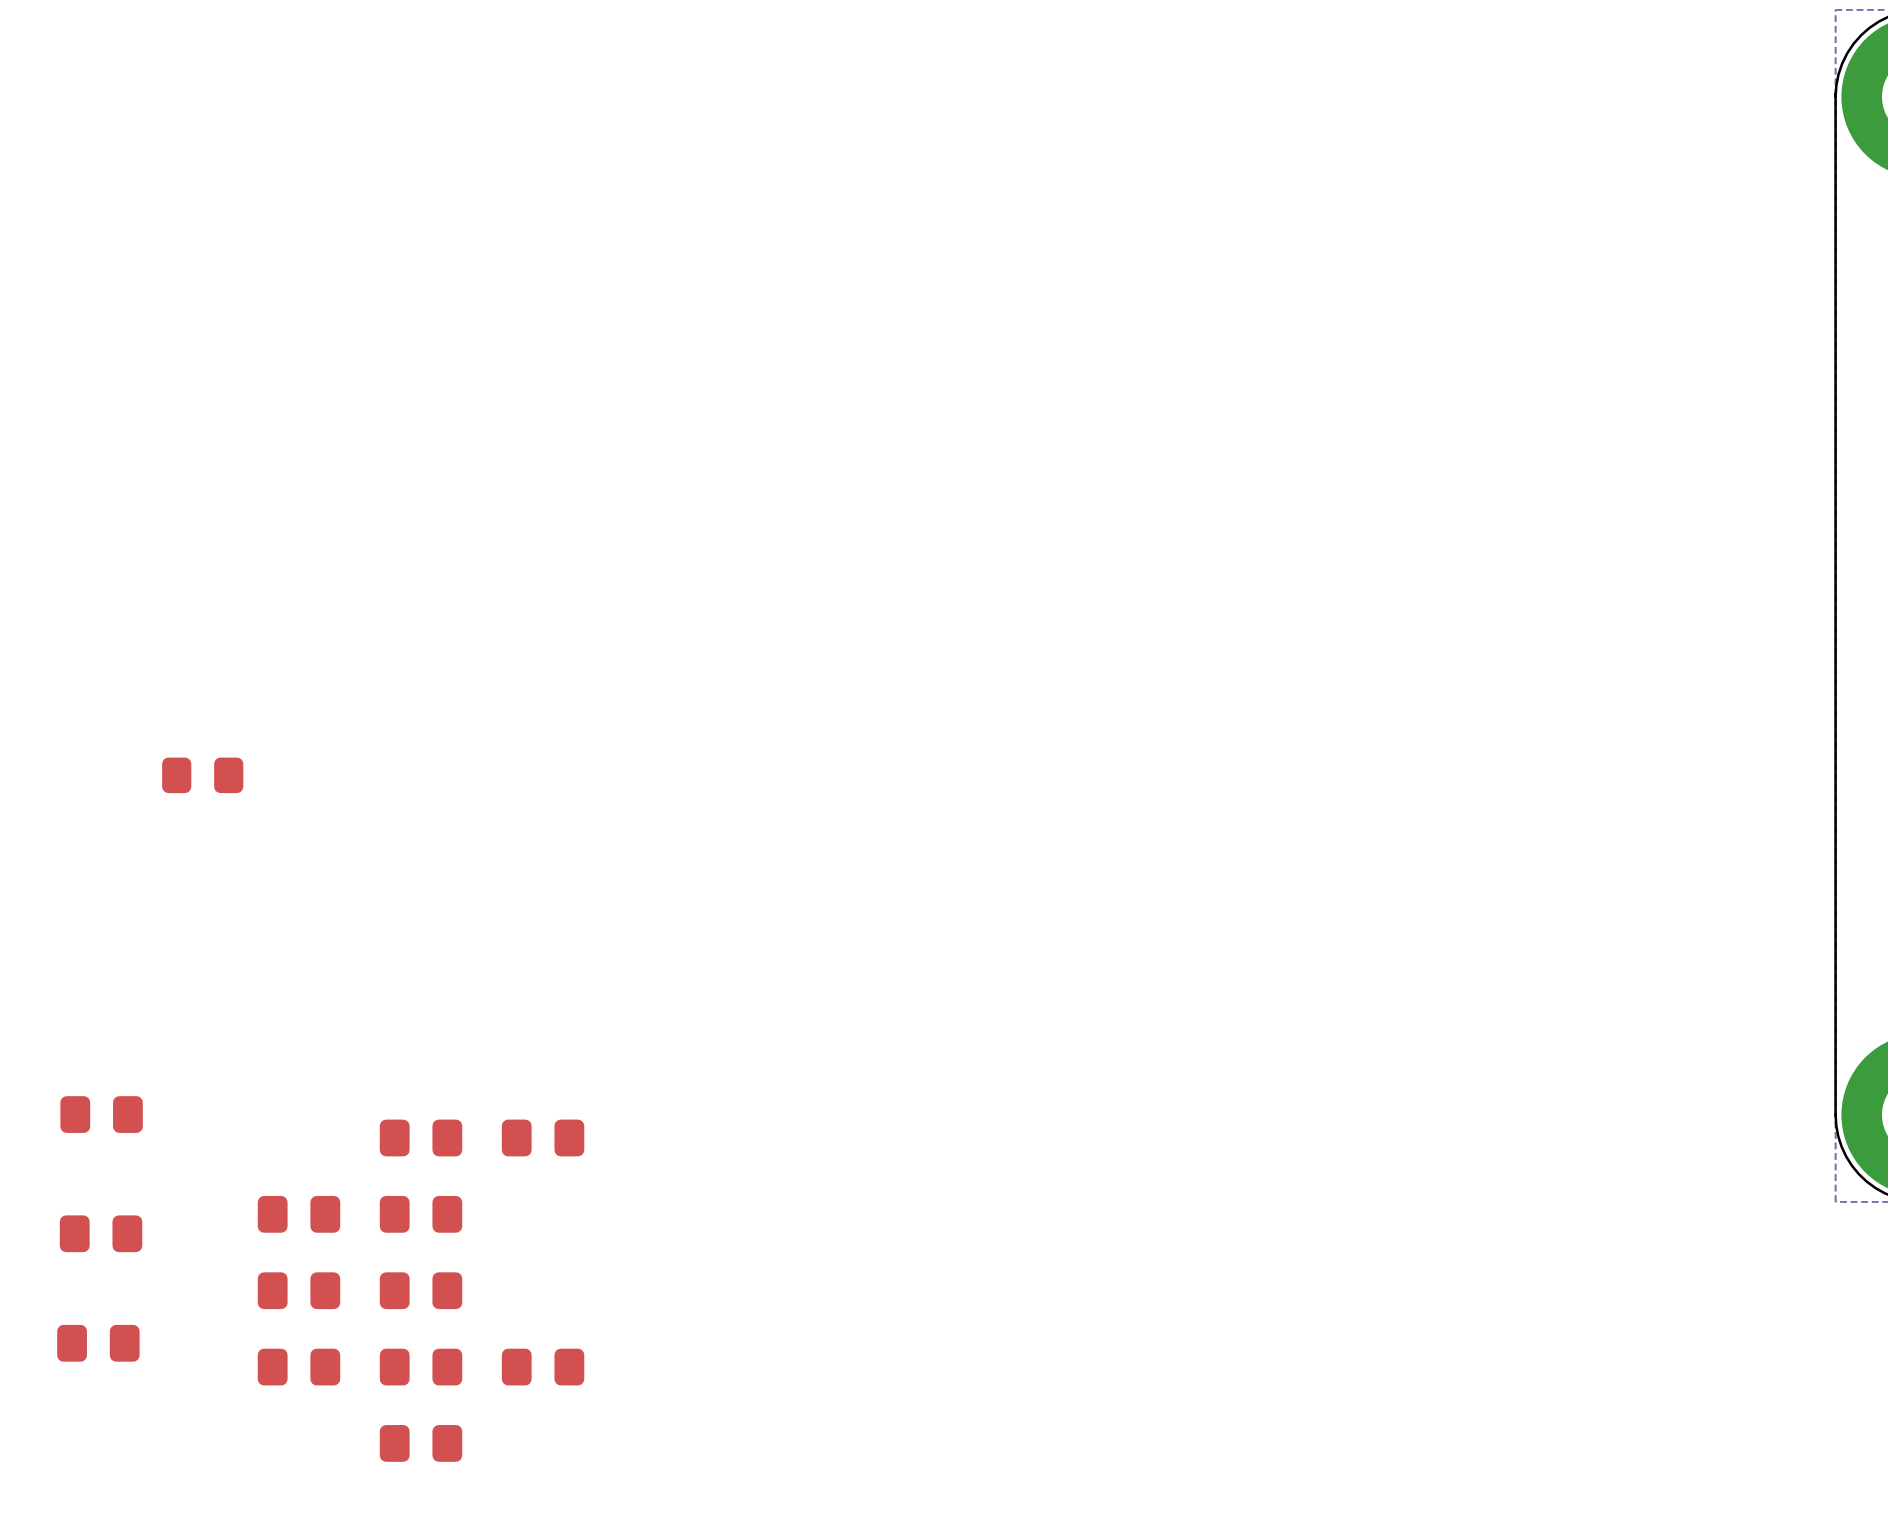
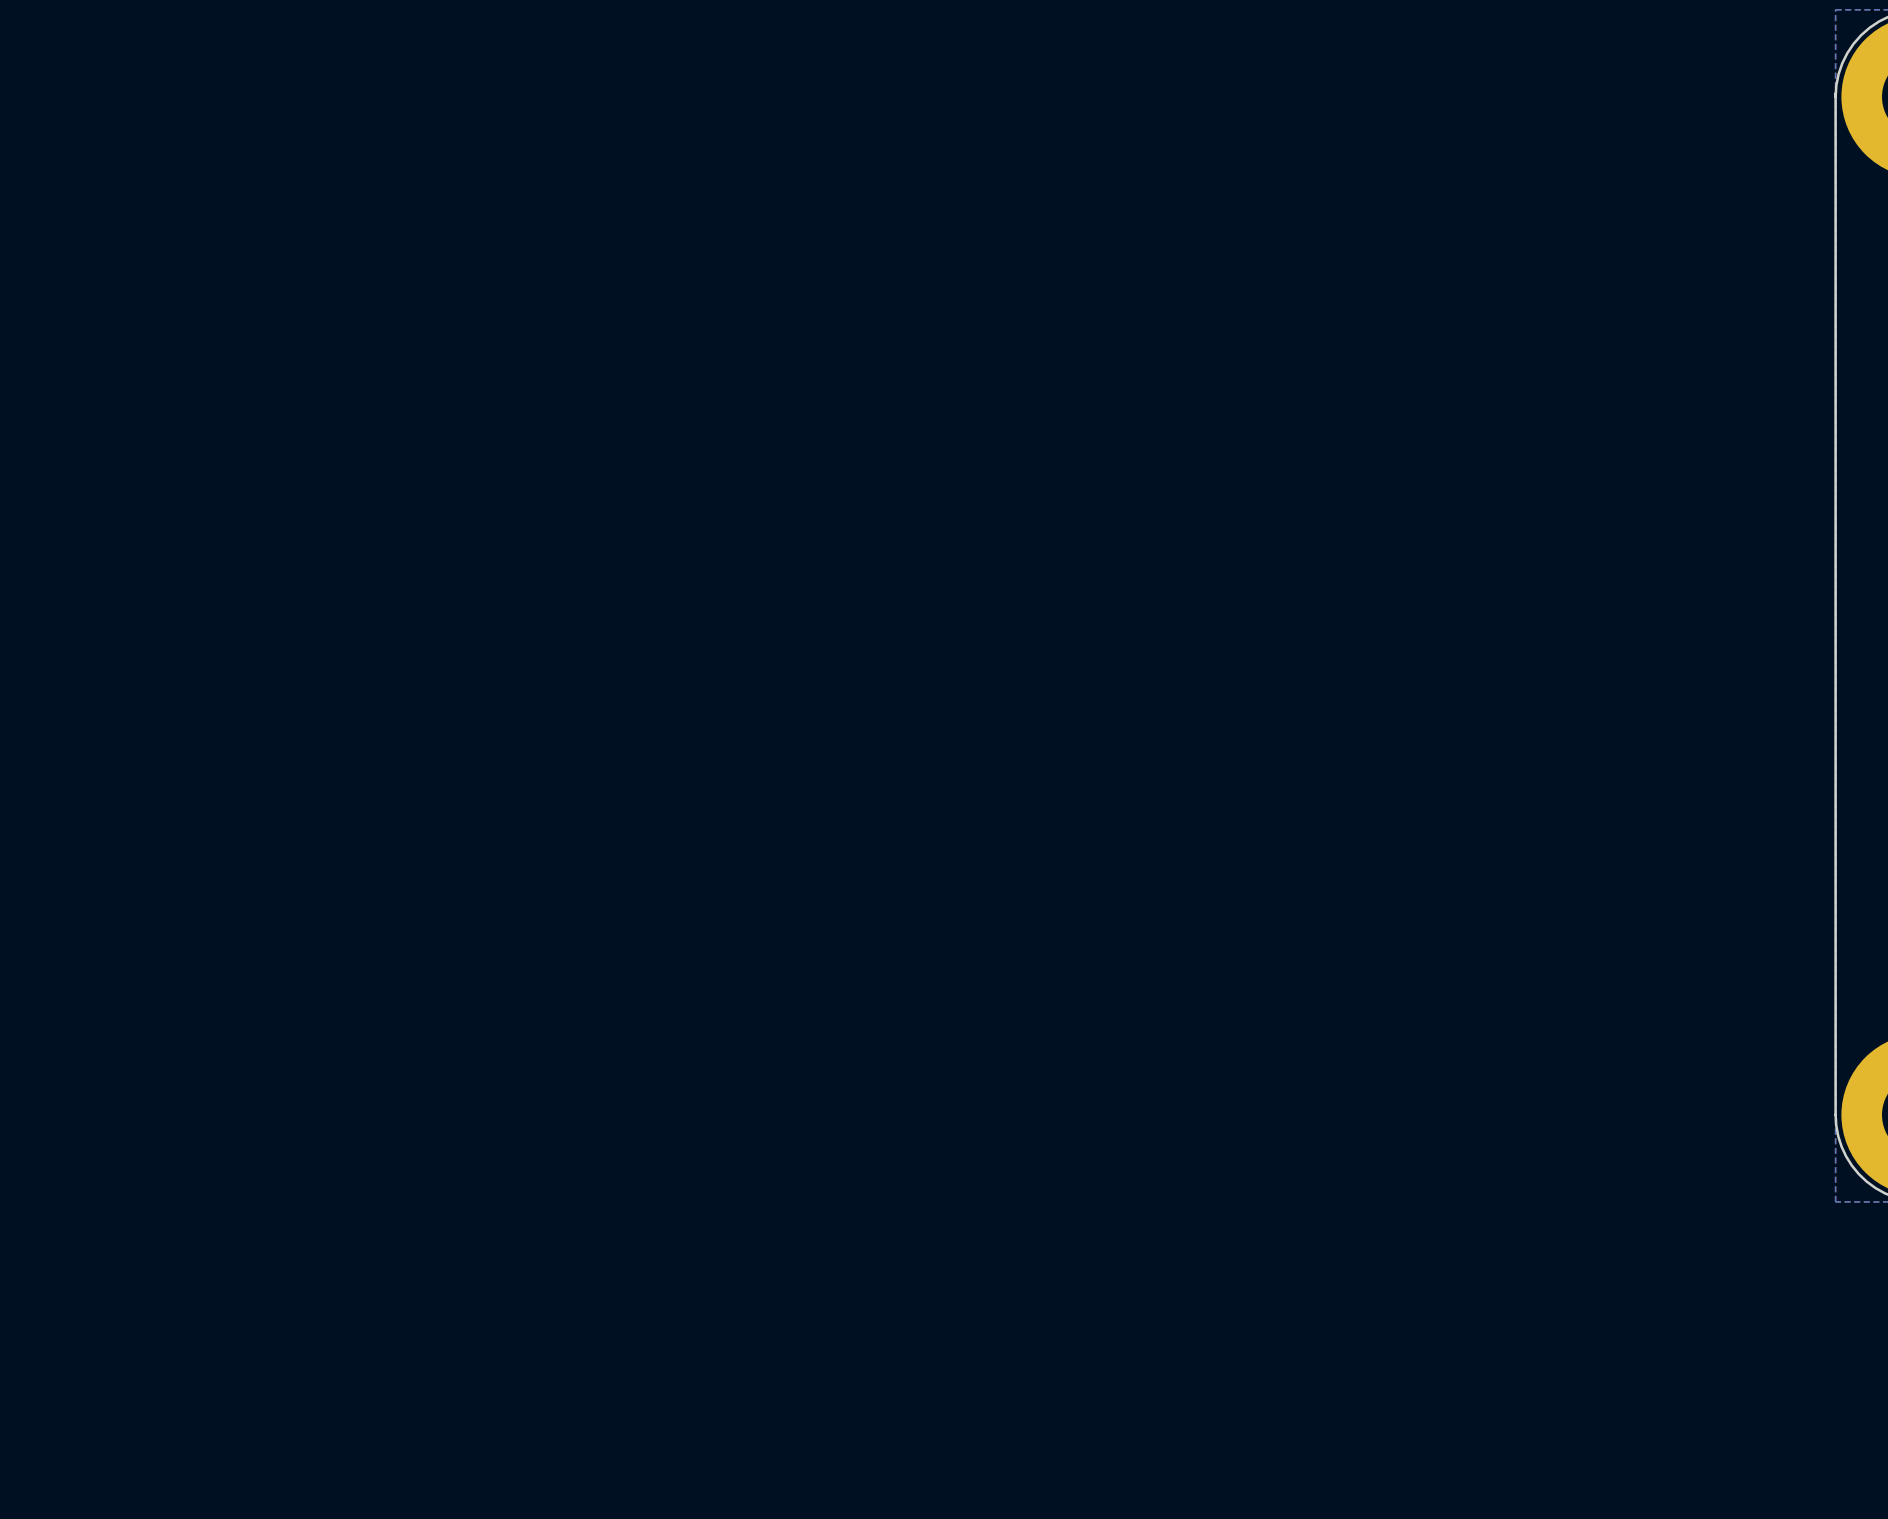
part: (202, 775) -> none
part: (101, 1114) -> none
part: (421, 1137) -> none
part: (543, 1137) -> none
part: (298, 1214) -> none
part: (421, 1214) -> none
part: (101, 1233) -> none
part: (298, 1290) -> none
part: (421, 1290) -> none
part: (98, 1343) -> none
part: (298, 1367) -> none
part: (421, 1367) -> none
part: (543, 1367) -> none
part: (421, 1443) -> none

